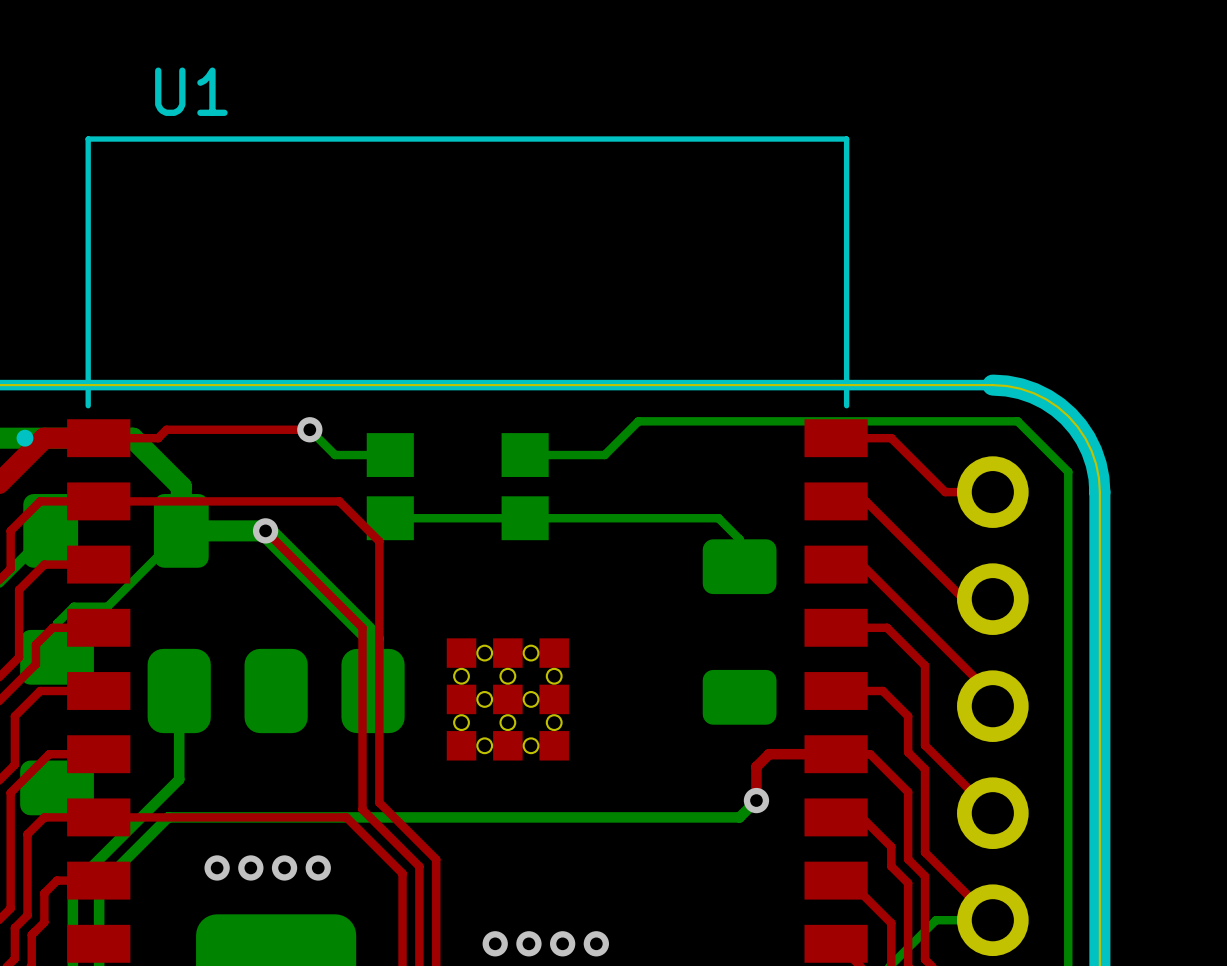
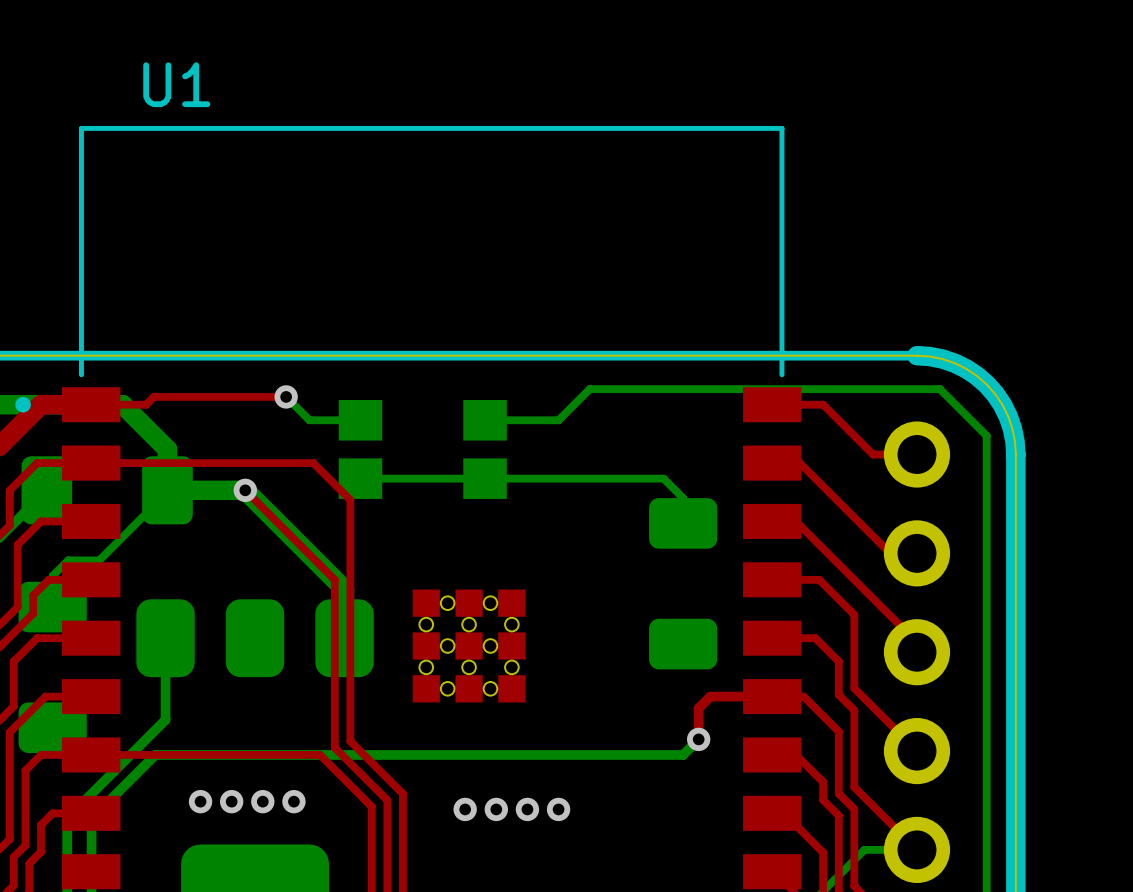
via: none -> (465, 809)
via: none -> (496, 809)
via: none -> (527, 809)
via: none -> (558, 809)
via: (495, 943) -> none
via: (528, 943) -> none
via: (562, 943) -> none
via: (596, 943) -> none

